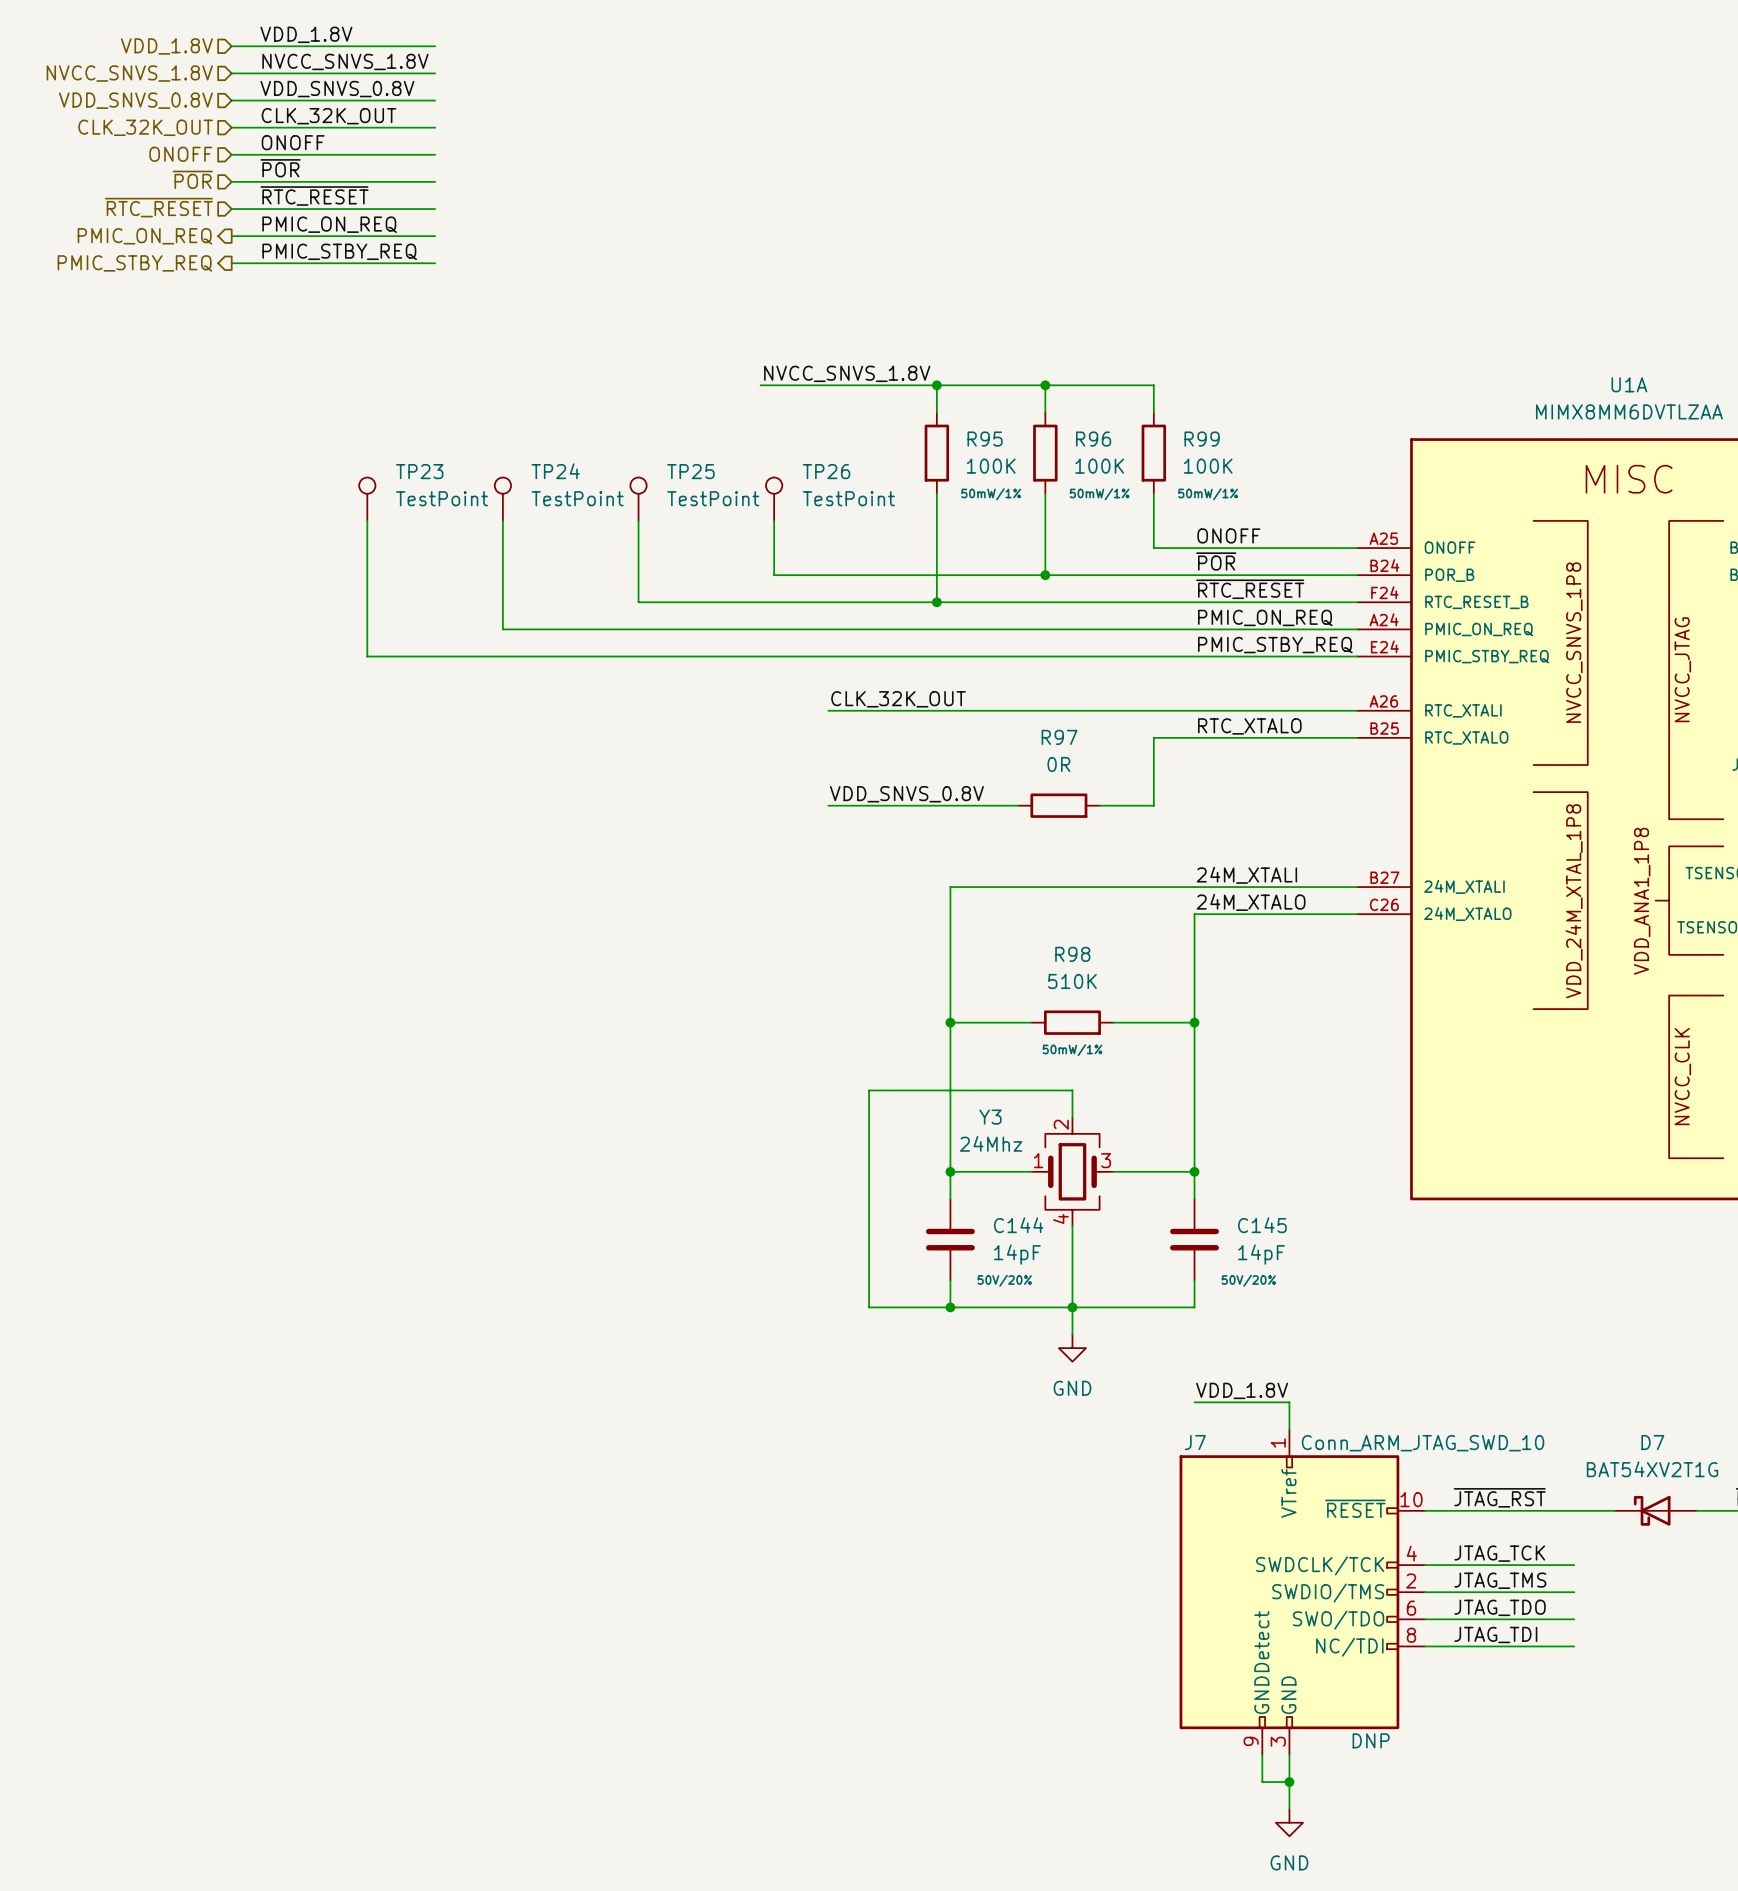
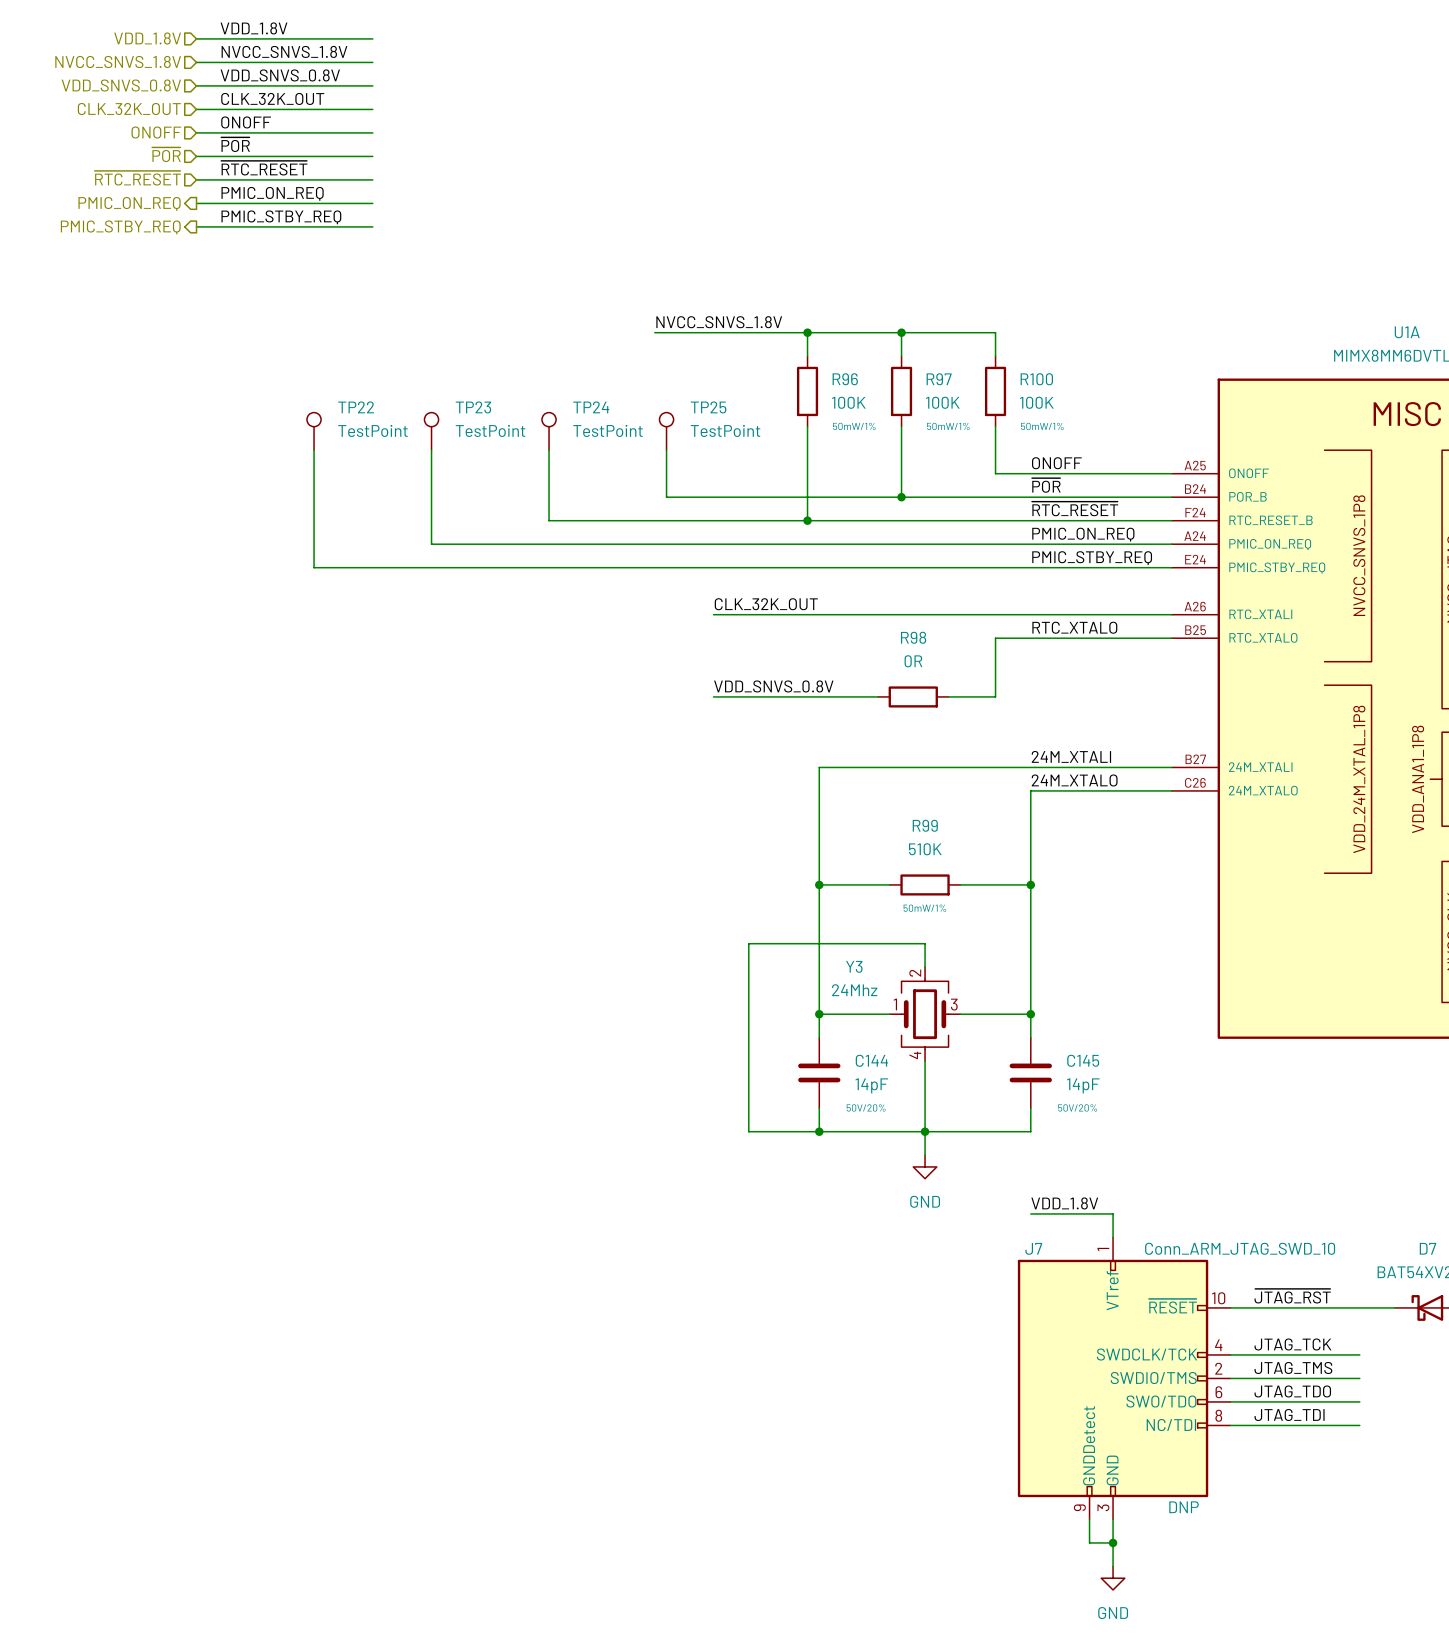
R95 name: R95 (985, 439) -> R96 (845, 379)
R96 name: R96 (1093, 439) -> R97 (939, 379)
R99 name: R99 (1202, 439) -> R100 (1036, 379)
TP23 name: TP23 (419, 471) -> TP22 (356, 407)
TP24 name: TP24 (555, 471) -> TP23 (473, 407)
TP25 name: TP25 (690, 471) -> TP24 (591, 407)
TP26 name: TP26 (826, 471) -> TP25 (708, 407)
R97 name: R97 (1059, 737) -> R98 (913, 637)
R98 name: R98 (1072, 954) -> R99 (925, 825)

